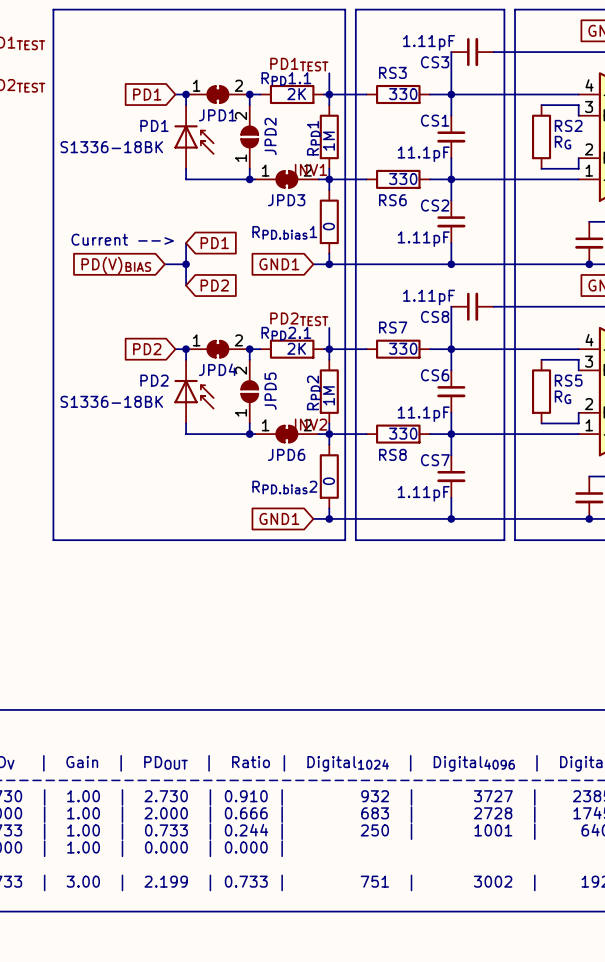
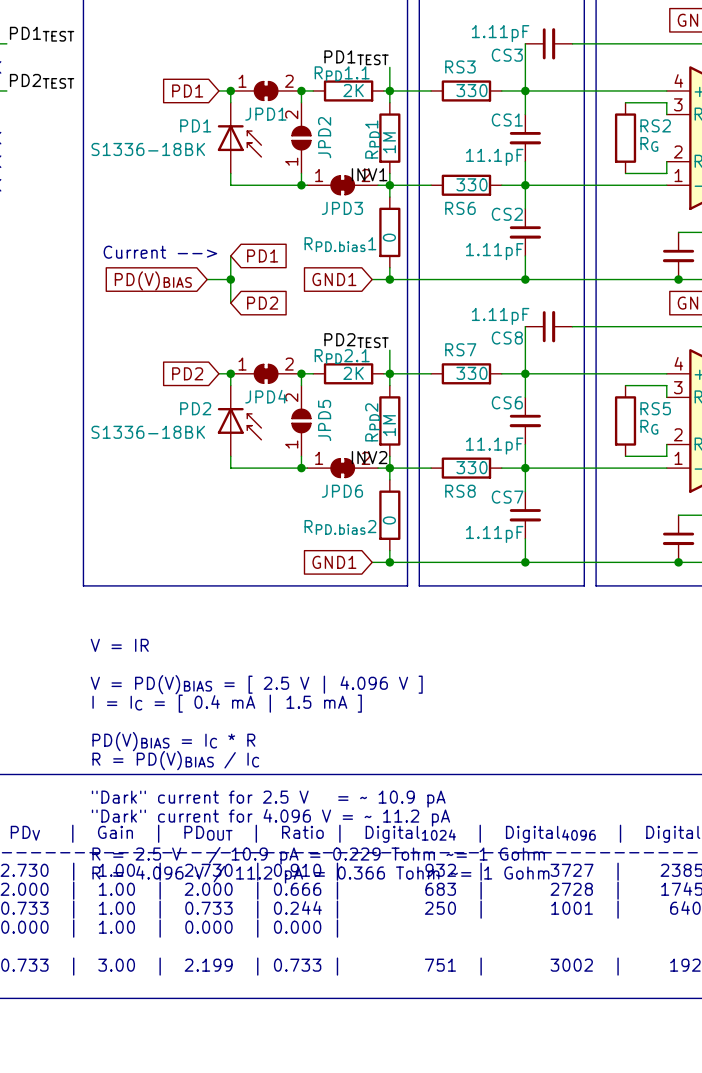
text: none -> V = IR (119, 645)
text: none -> V = PD(V)BIAS = [ 2.5 V | 4.096 V ] (256, 684)
text: none -> I = IC = [ 0.4 mA | 1.5 mA ] (227, 703)
text: none -> PD(V)BIAS = IC * R (173, 741)
text: none -> R = PD(V)BIAS / IC (175, 760)
text: none -> "Dark" current for 2.5 V = ~ 10.9 pA (268, 799)
text: none -> "Dark" current for 4.096 V = ~ 11.2 pA (270, 817)
text: none -> R = 2.5 V / 10.9 pA = 0.229 Tohm ~= 1 Gohm (318, 855)
text: none -> R = 4.096 V / 11.2 pA = 0.366 Tohm ~= 1 Gohm (320, 874)

